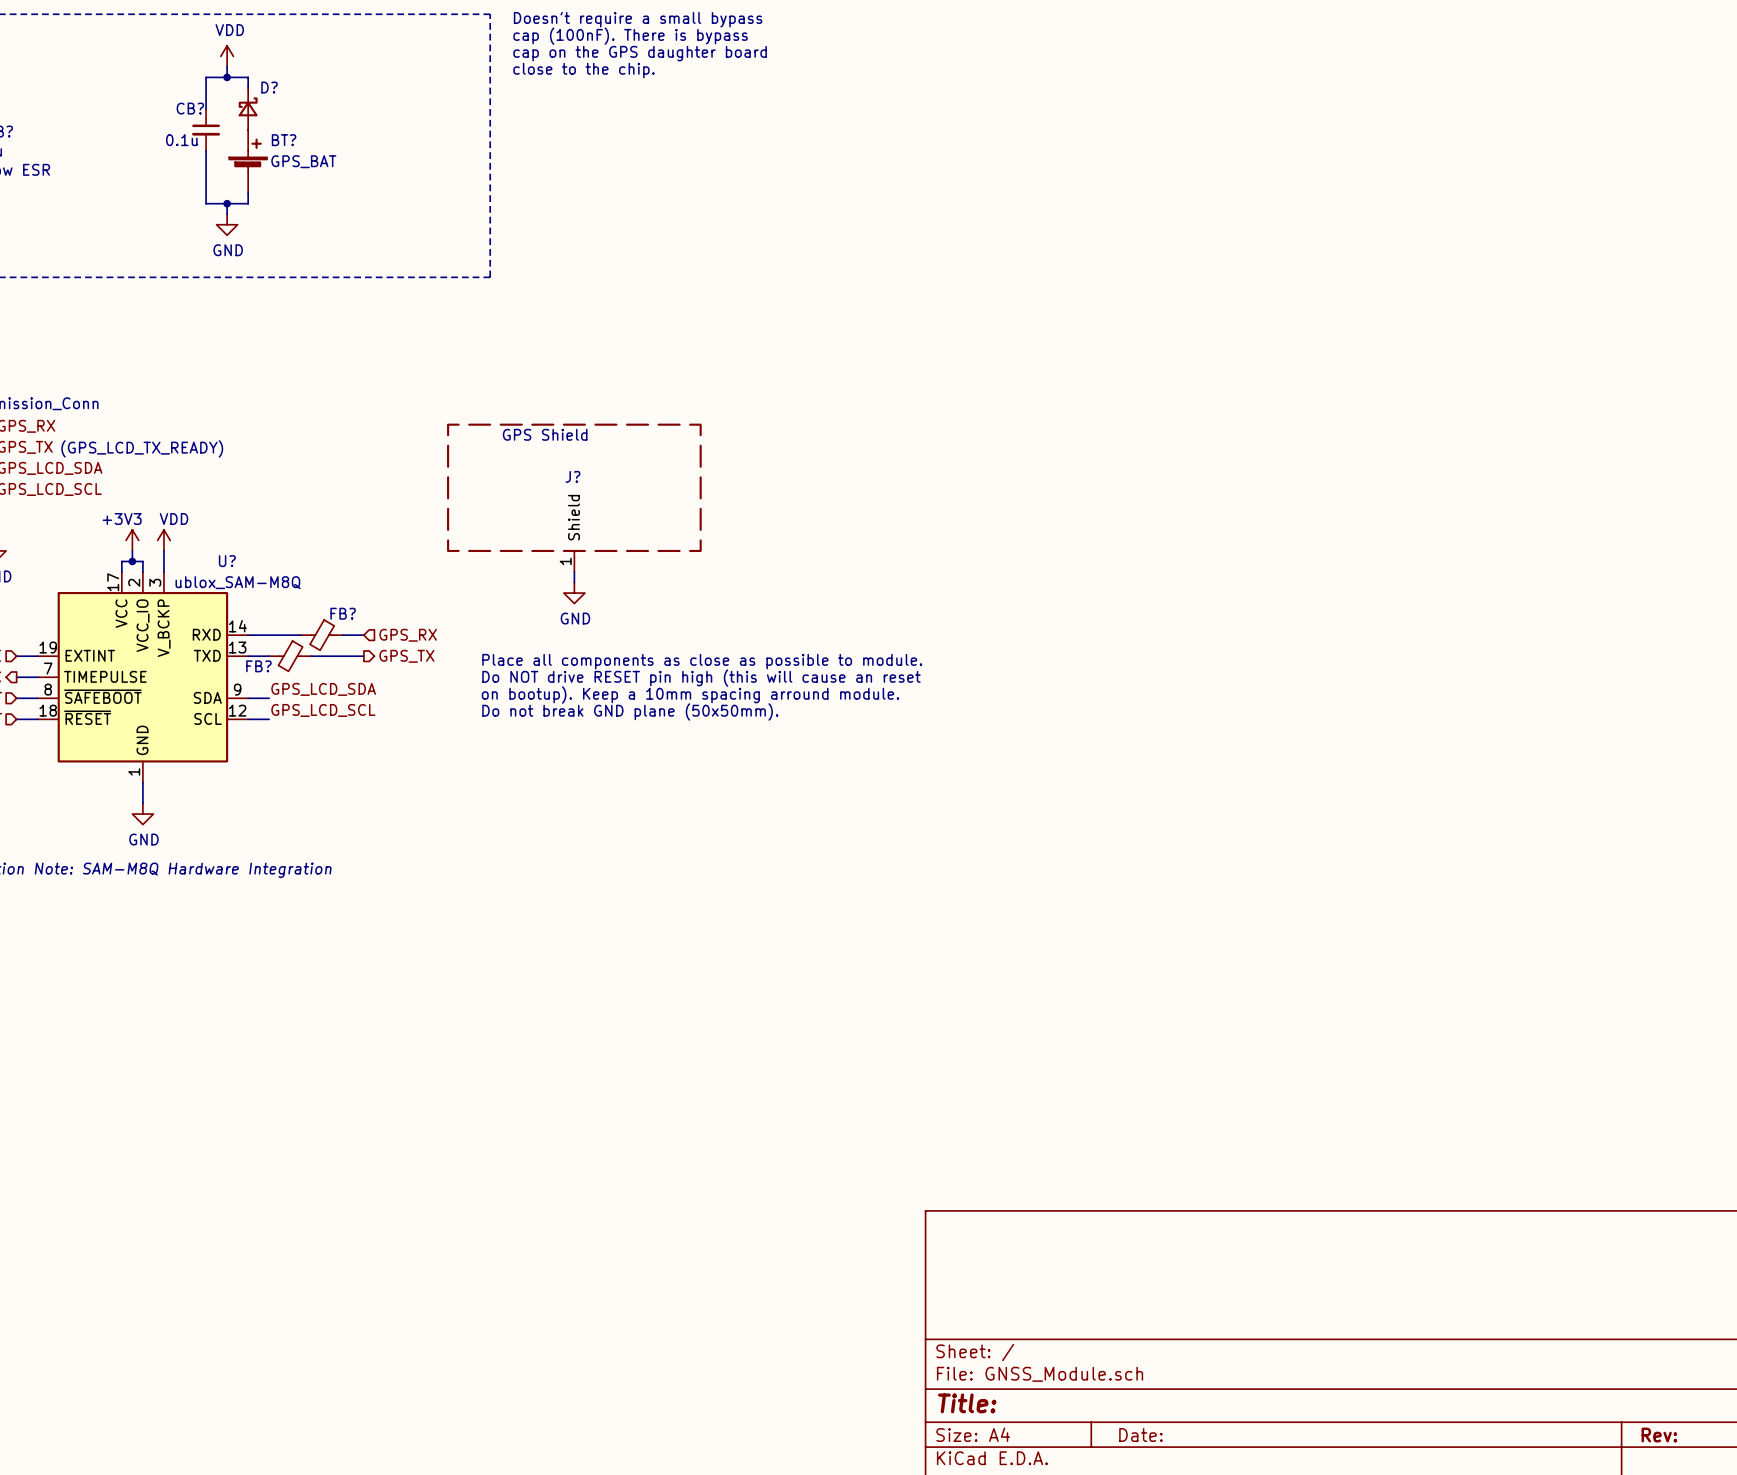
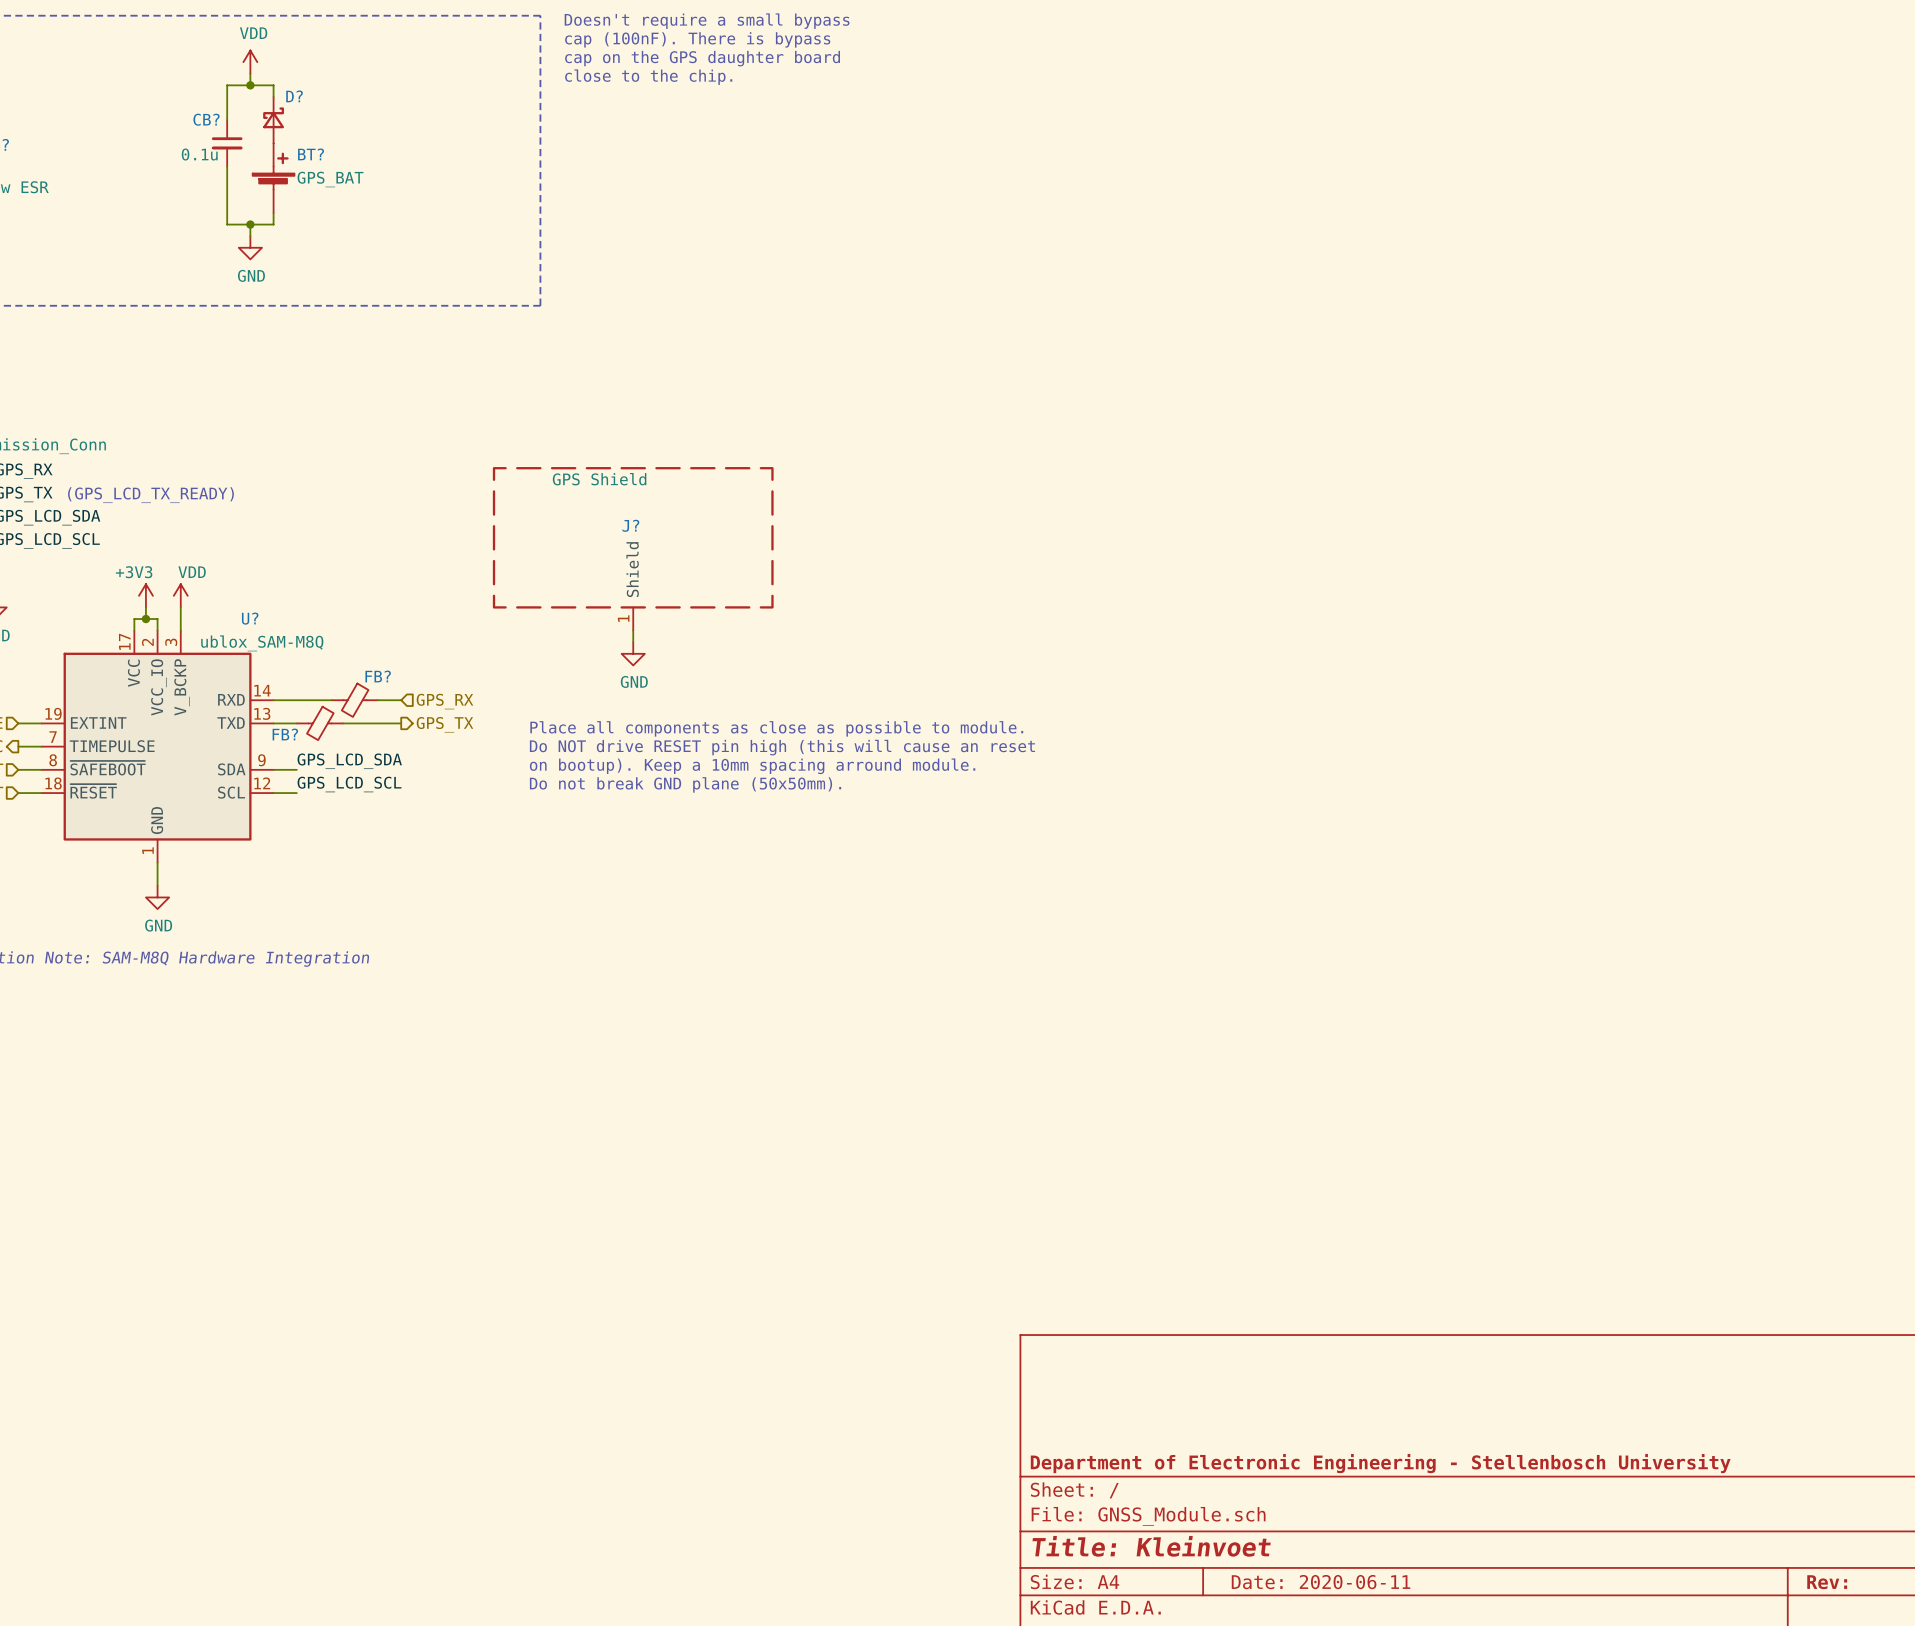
title block: none -> Department of Electronic Engineering - Stellenbosch University (1380, 1463)
title block: Title: (967, 1403) -> Title: Kleinvoet (1151, 1546)
title block: Date: (1140, 1435) -> Date: 2020-06-11 (1321, 1582)

